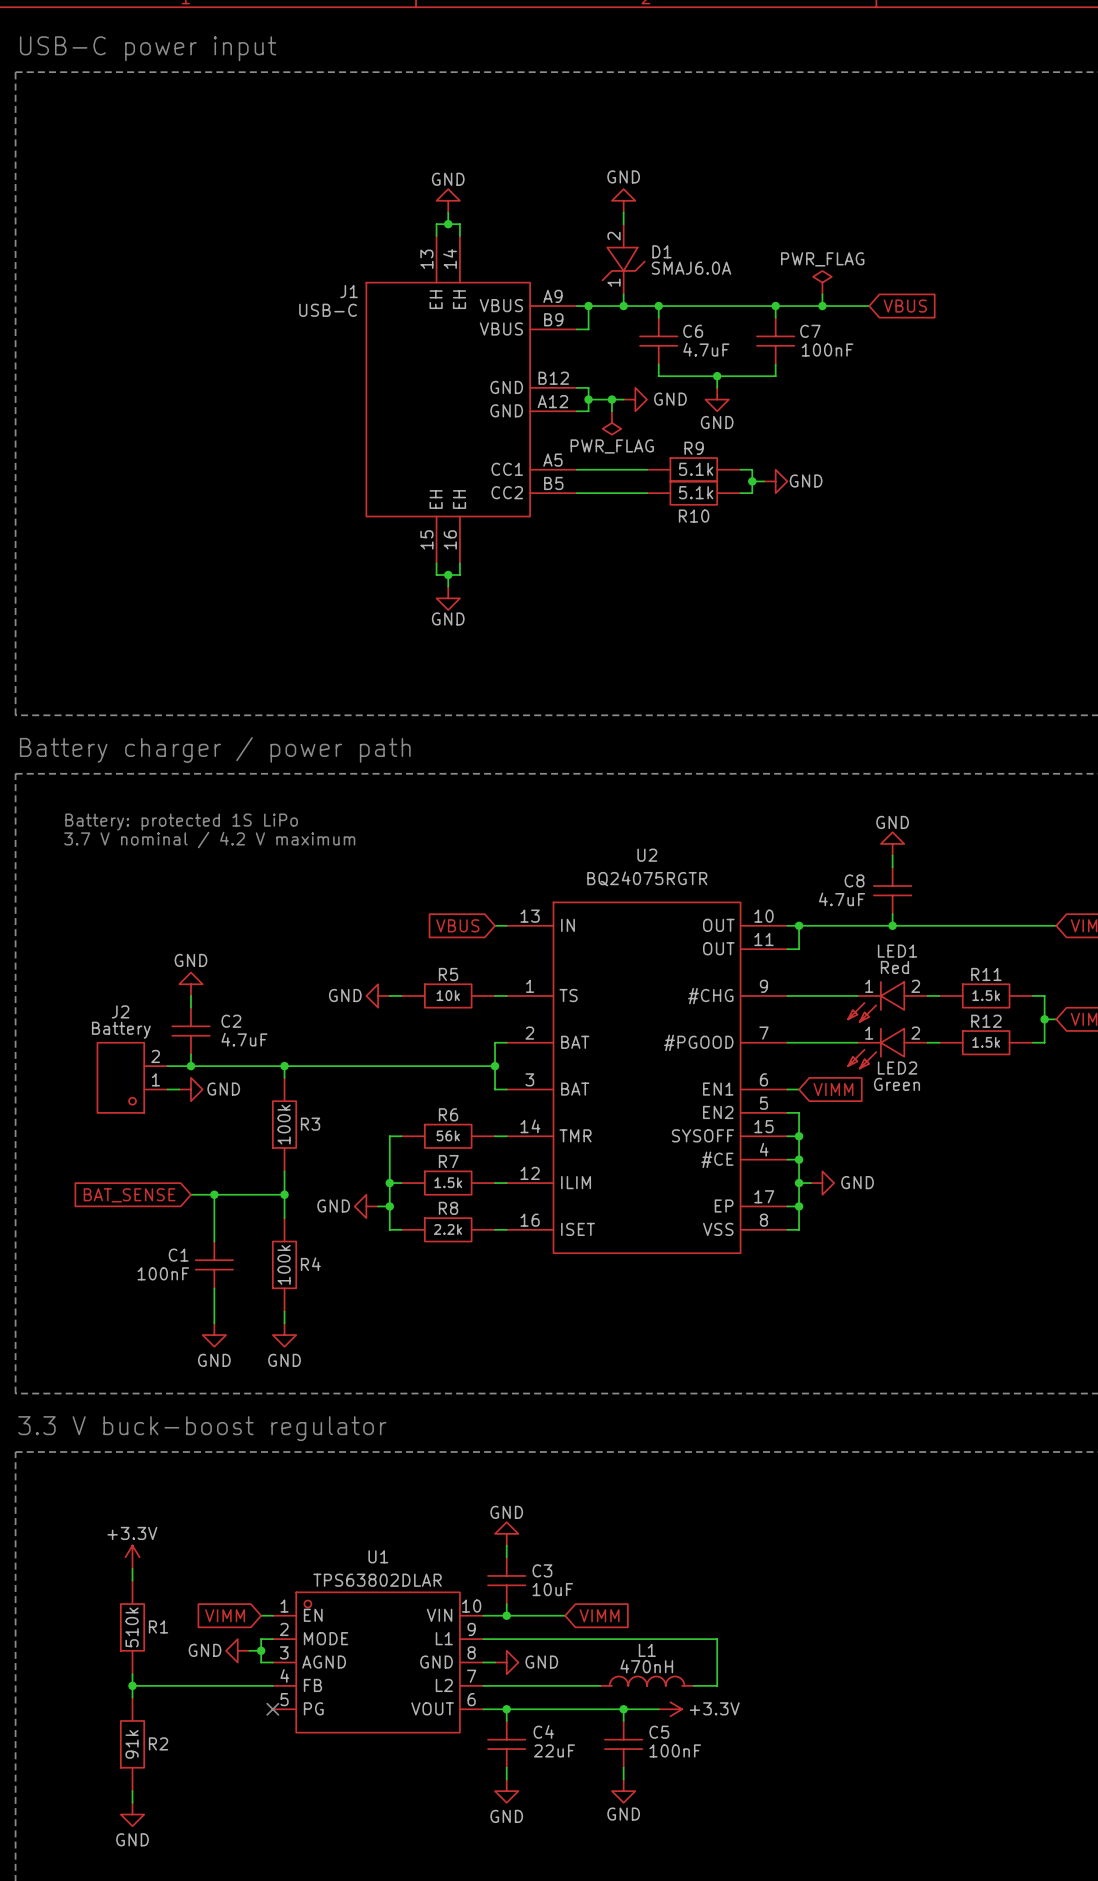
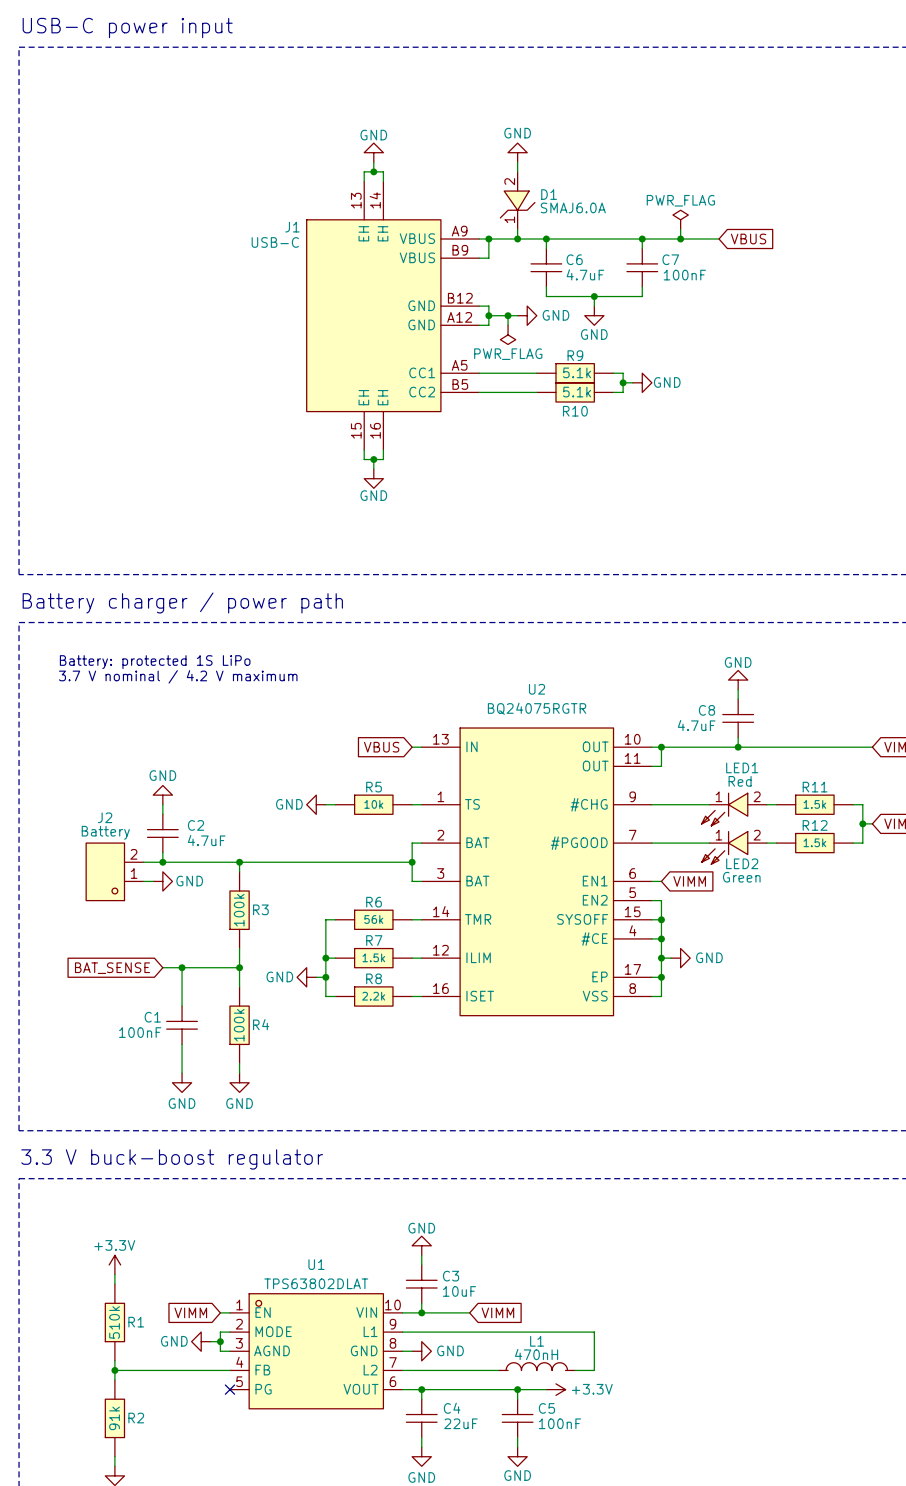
U1 value: TPS63802DLAR (377, 1580) -> TPS63802DLAT (316, 1283)

